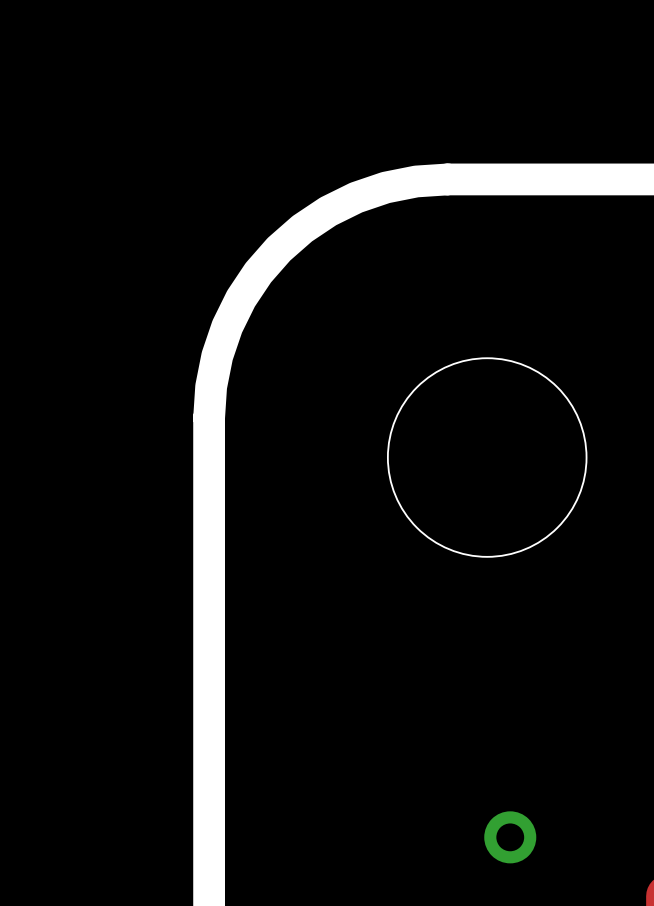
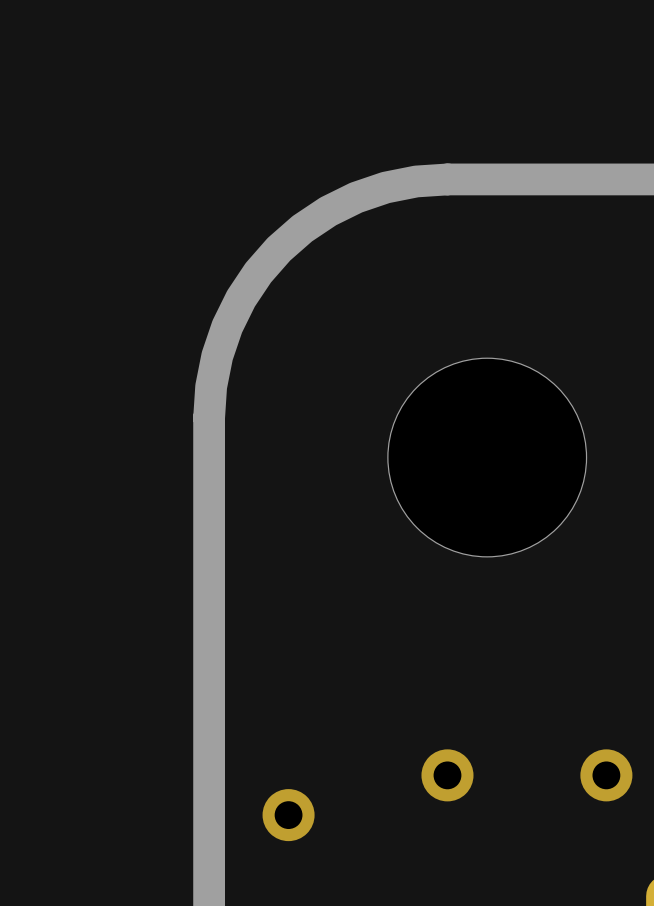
via: none -> (447, 775)
via: none -> (606, 775)
via: none -> (288, 815)
via: (510, 837) -> none

